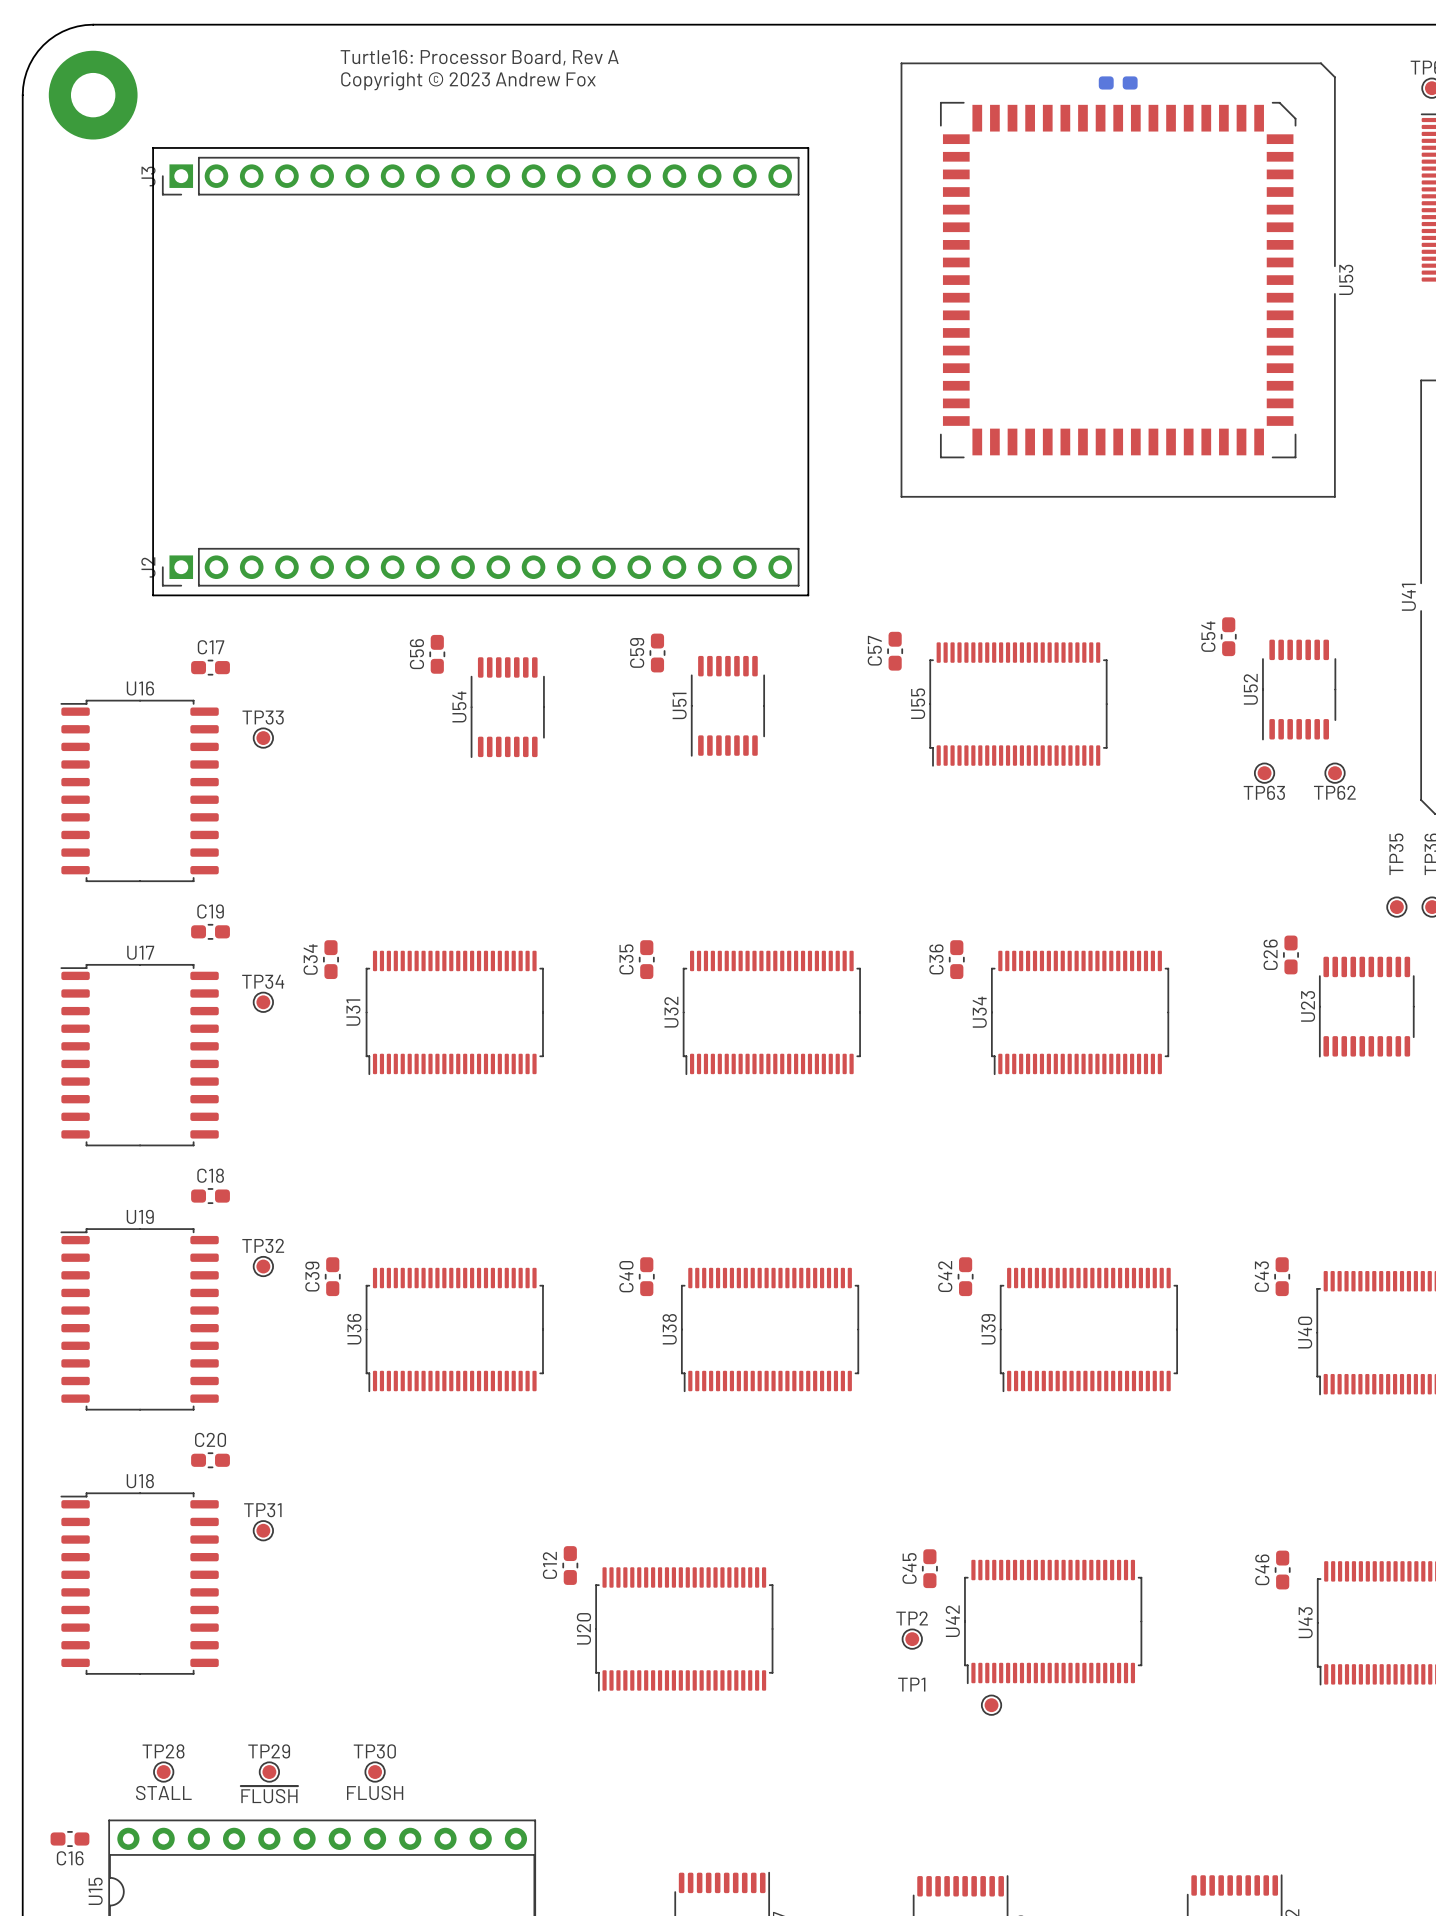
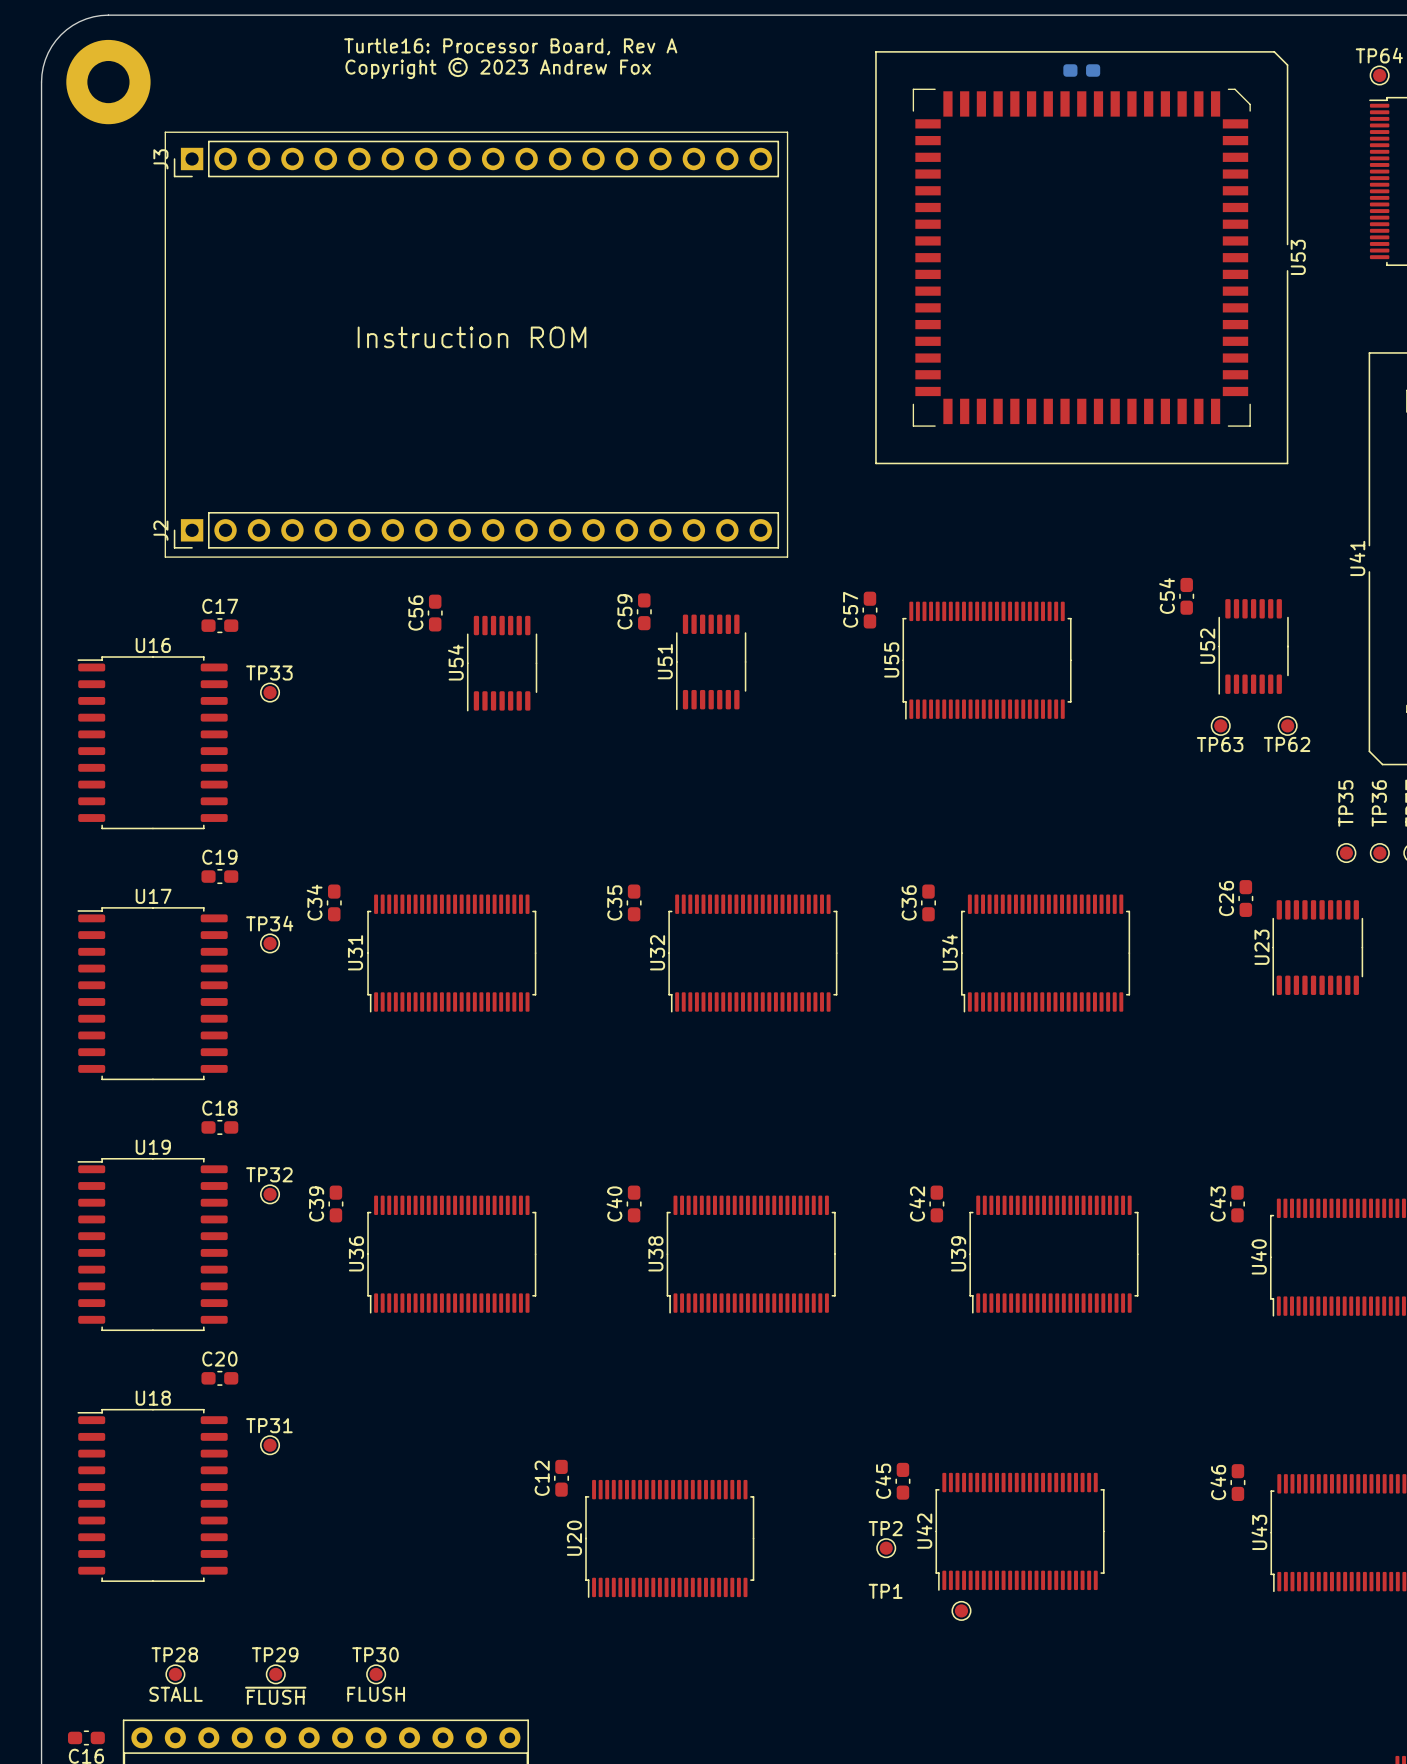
board edge: (153, 147) (153, 595) (808, 595) (808, 147) (153, 147) -> none
line: none -> (165, 132) (165, 557) (787, 557) (787, 132) (165, 132)
text: none -> Instruction ROM (472, 337)

